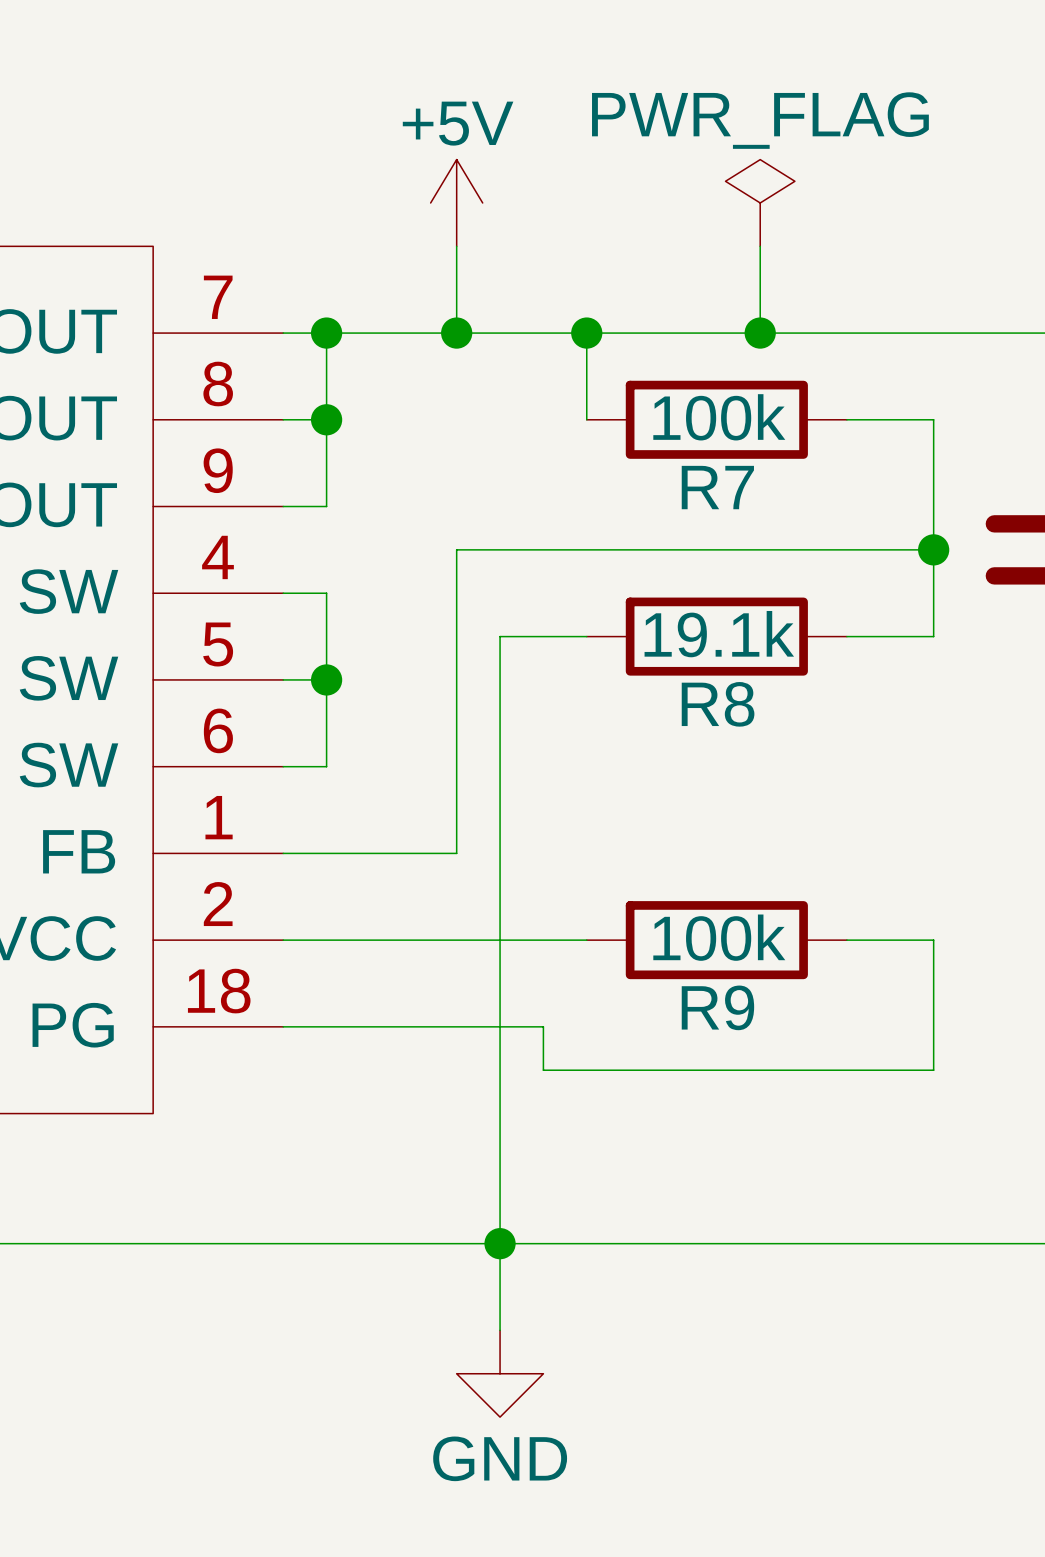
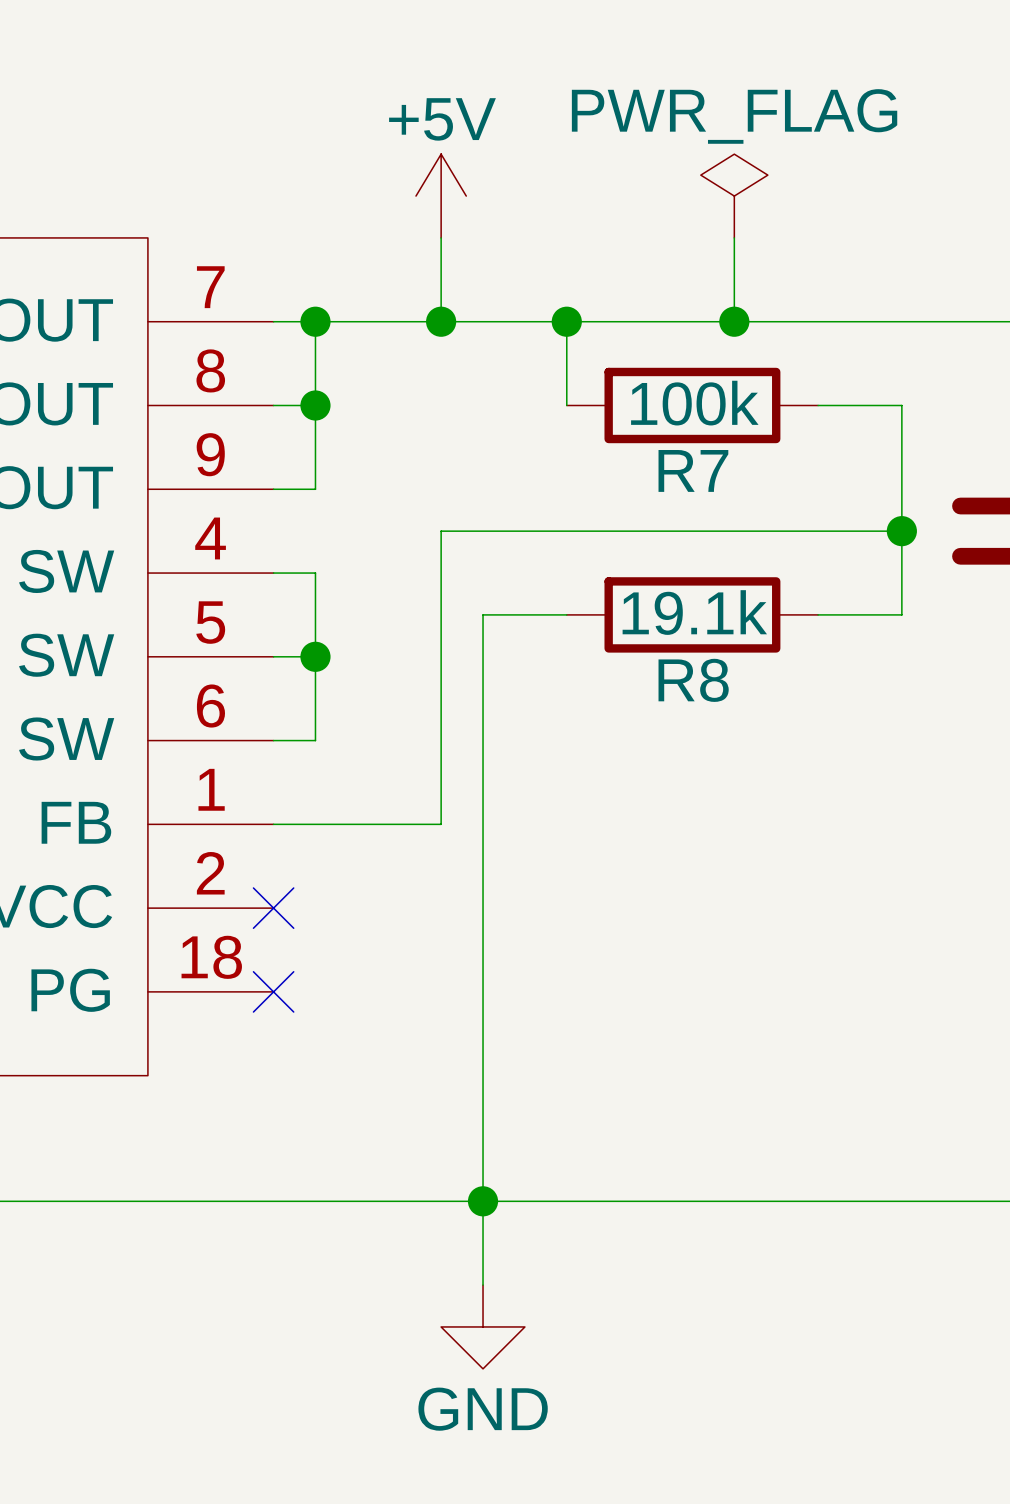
wire: (283, 940) (586, 940) -> none
no-connect mark: none -> (273, 908)
R9: 100k (716, 940) -> none
wire: (846, 940) (933, 940) (933, 1070) (543, 1070) (543, 1026) (283, 1026) -> none
no-connect mark: none -> (273, 991)

